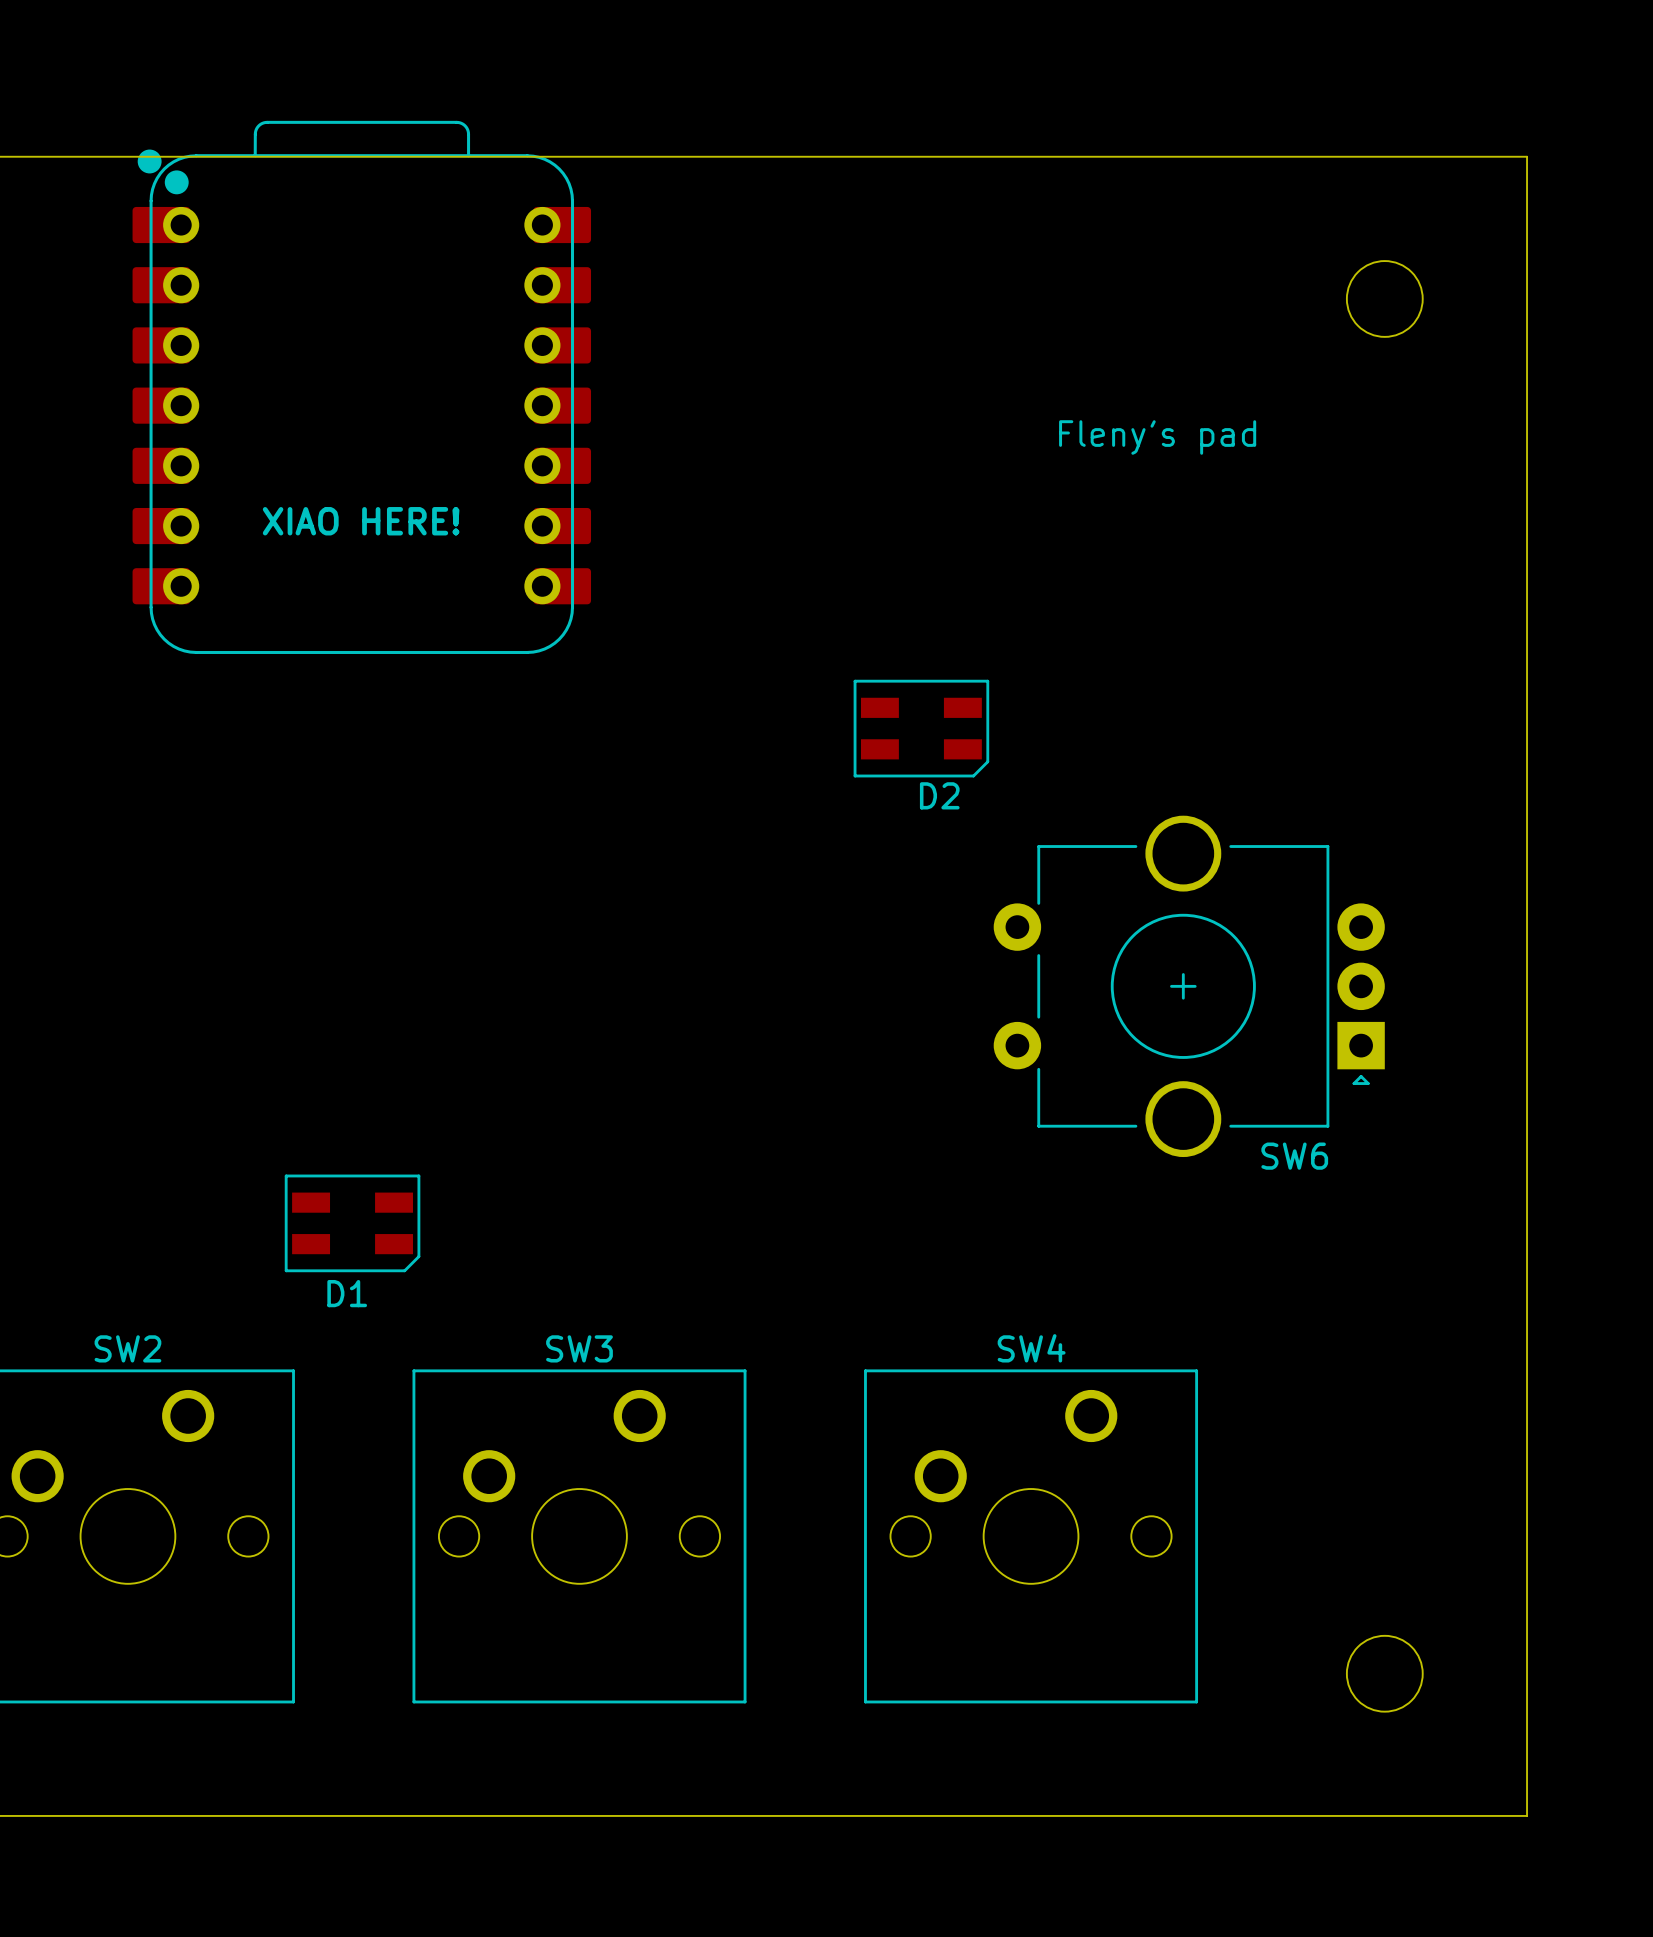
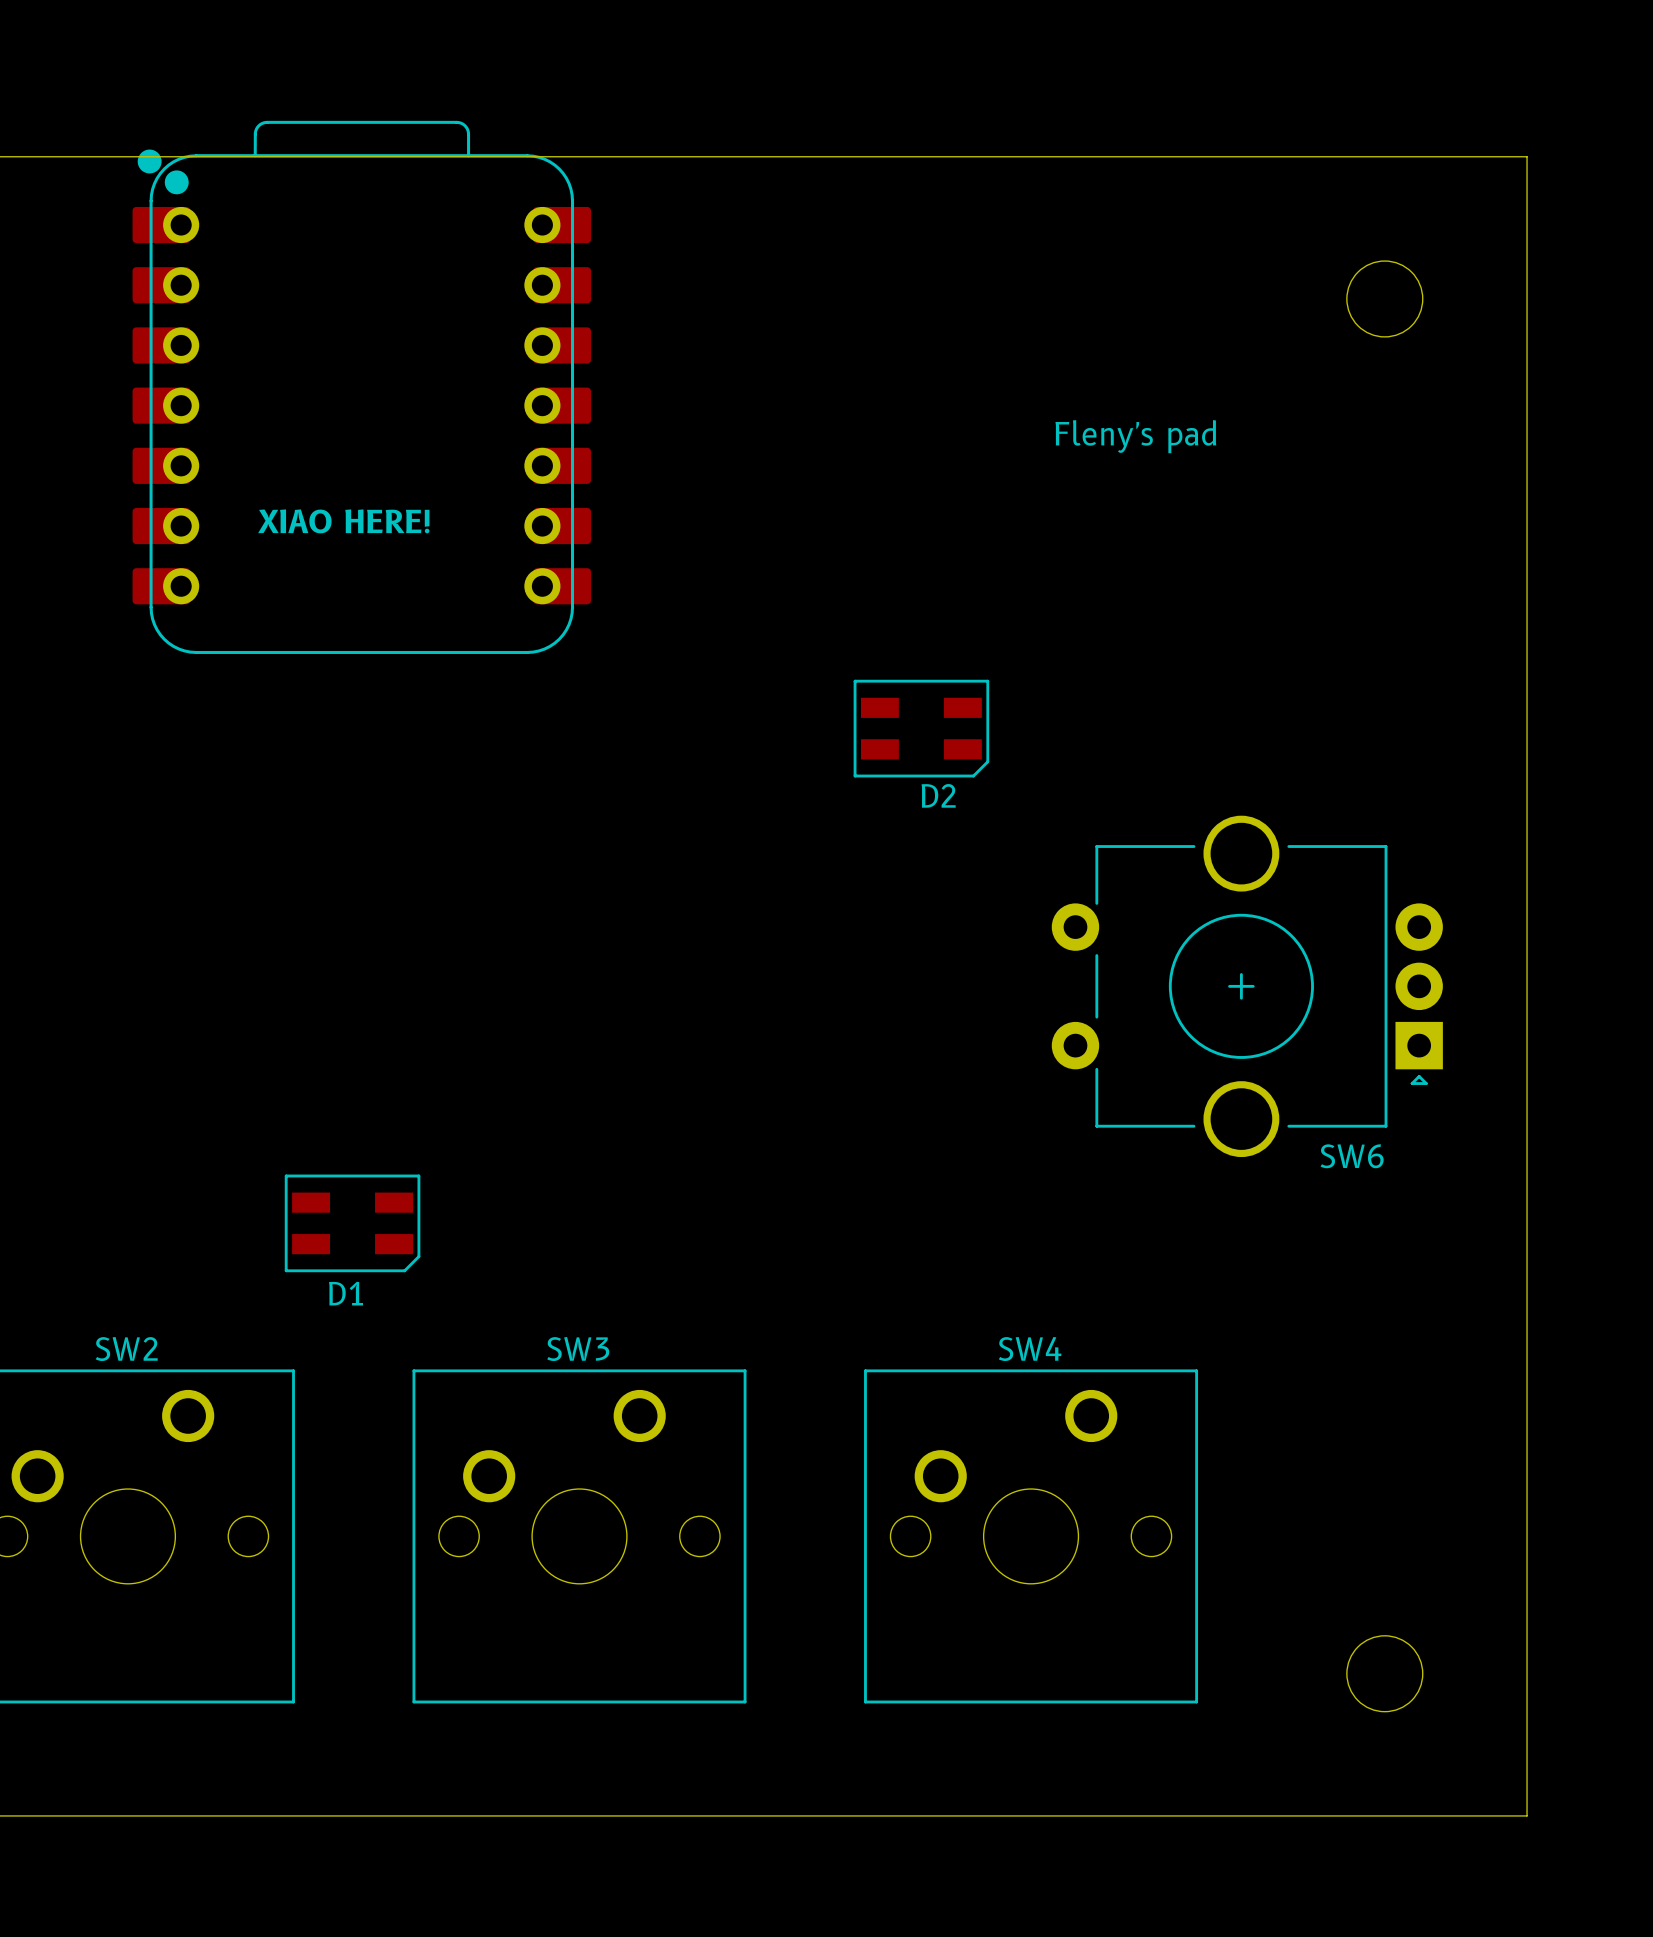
SW6 position: (1189, 986) -> (1247, 986)

